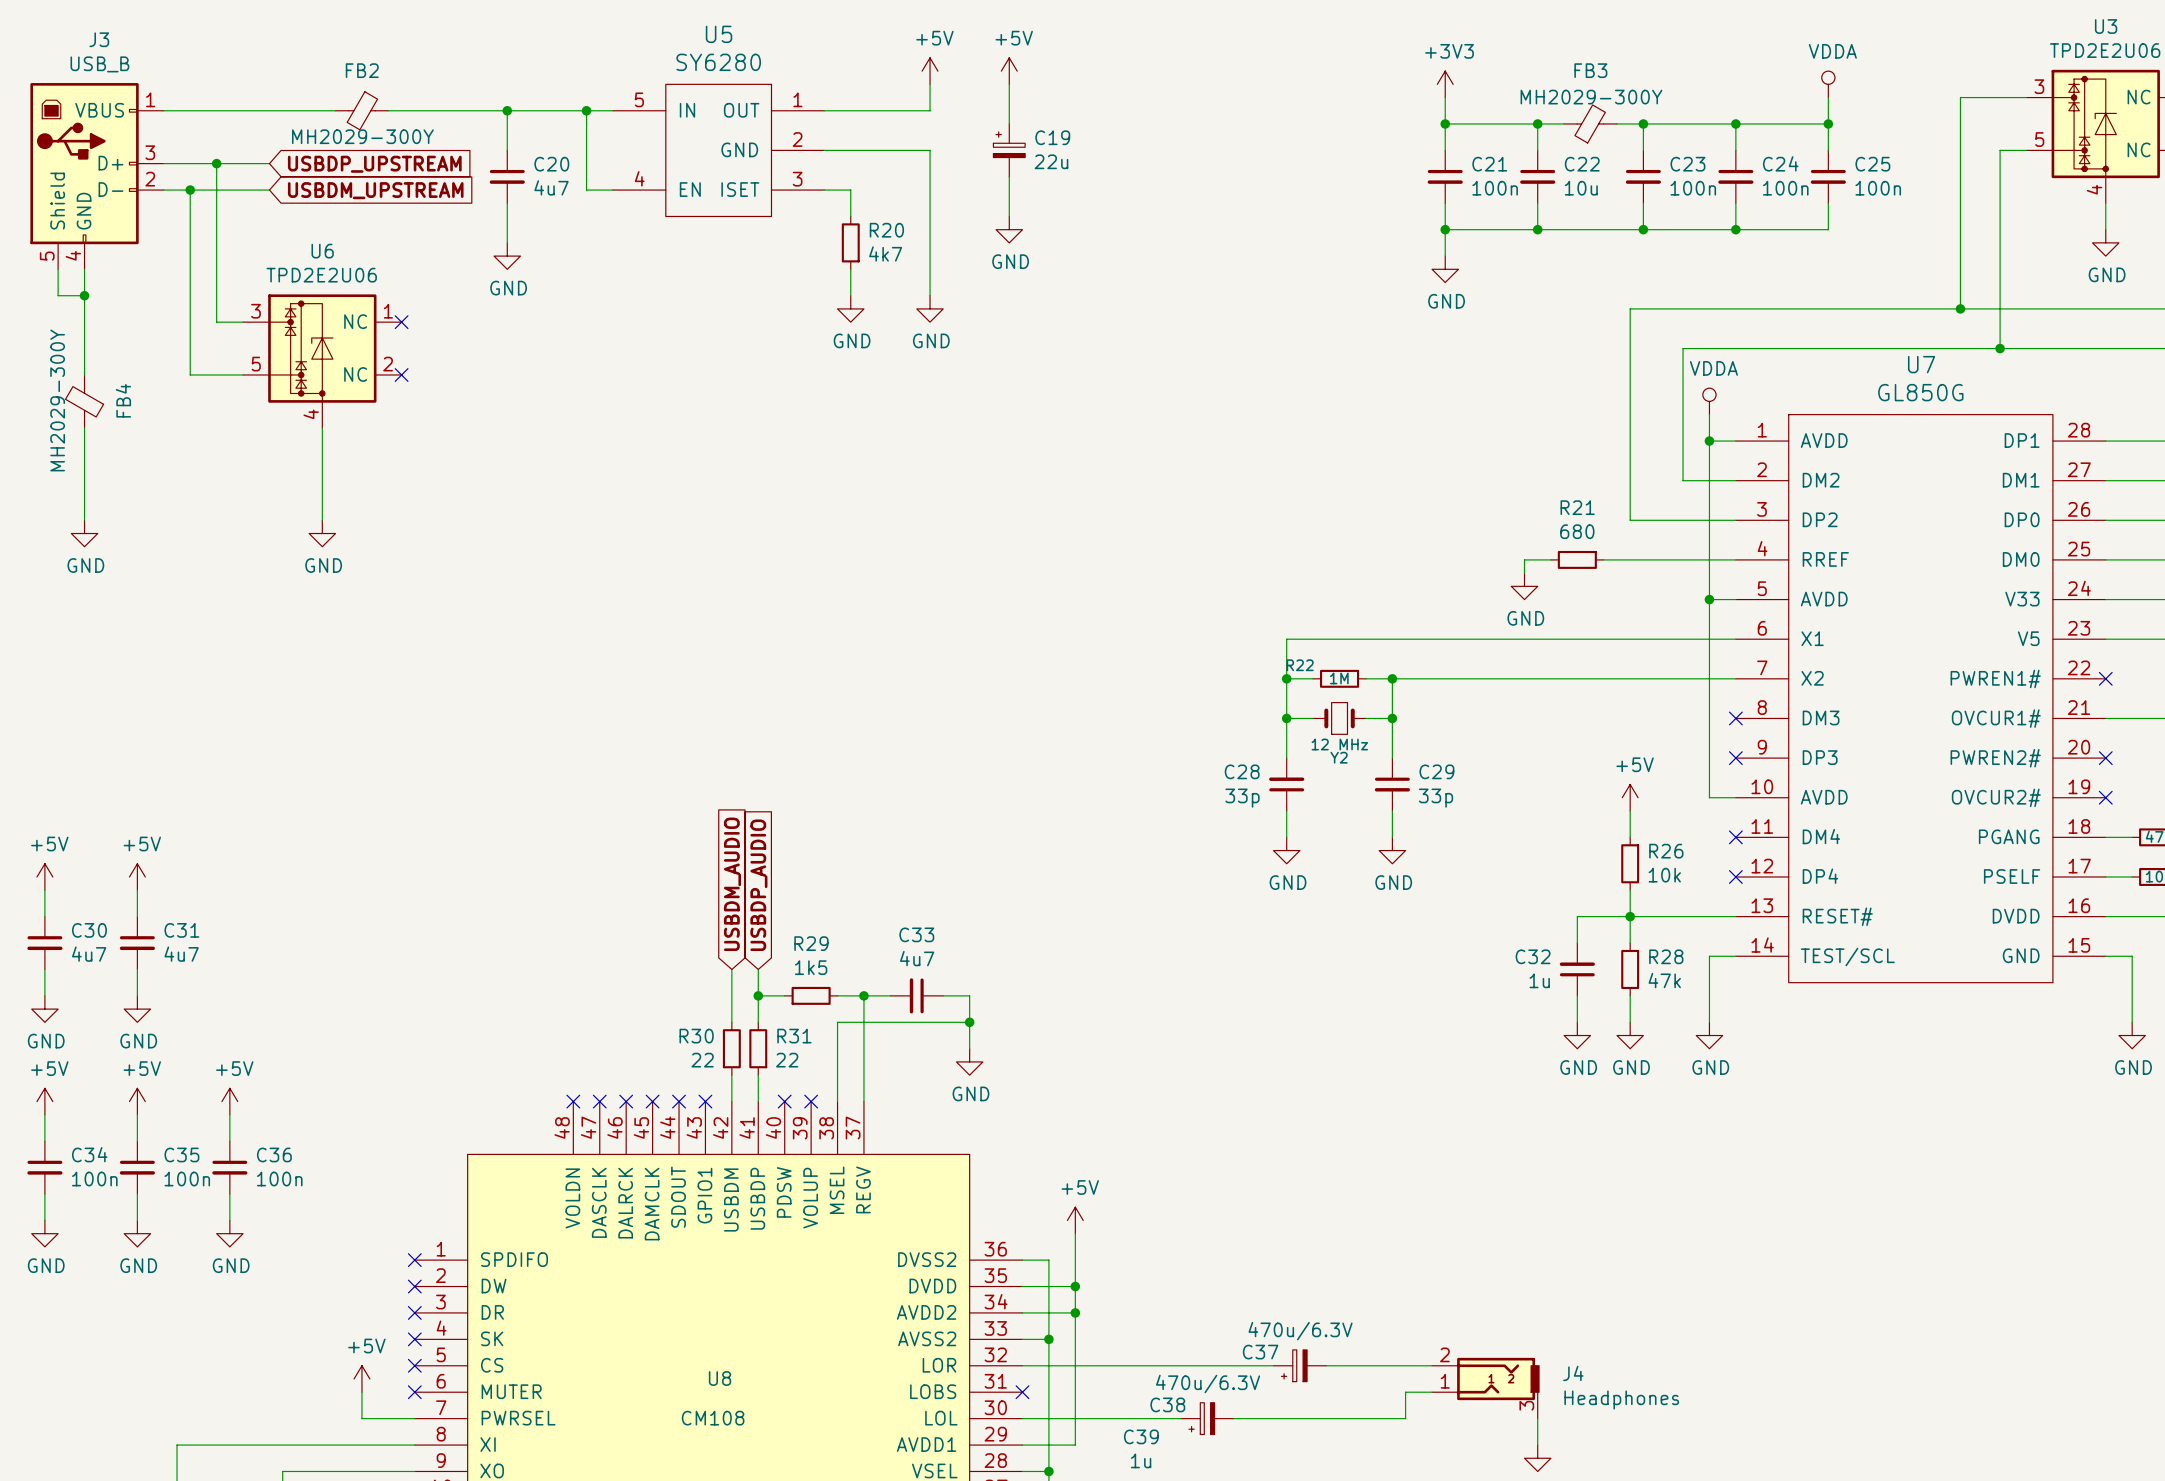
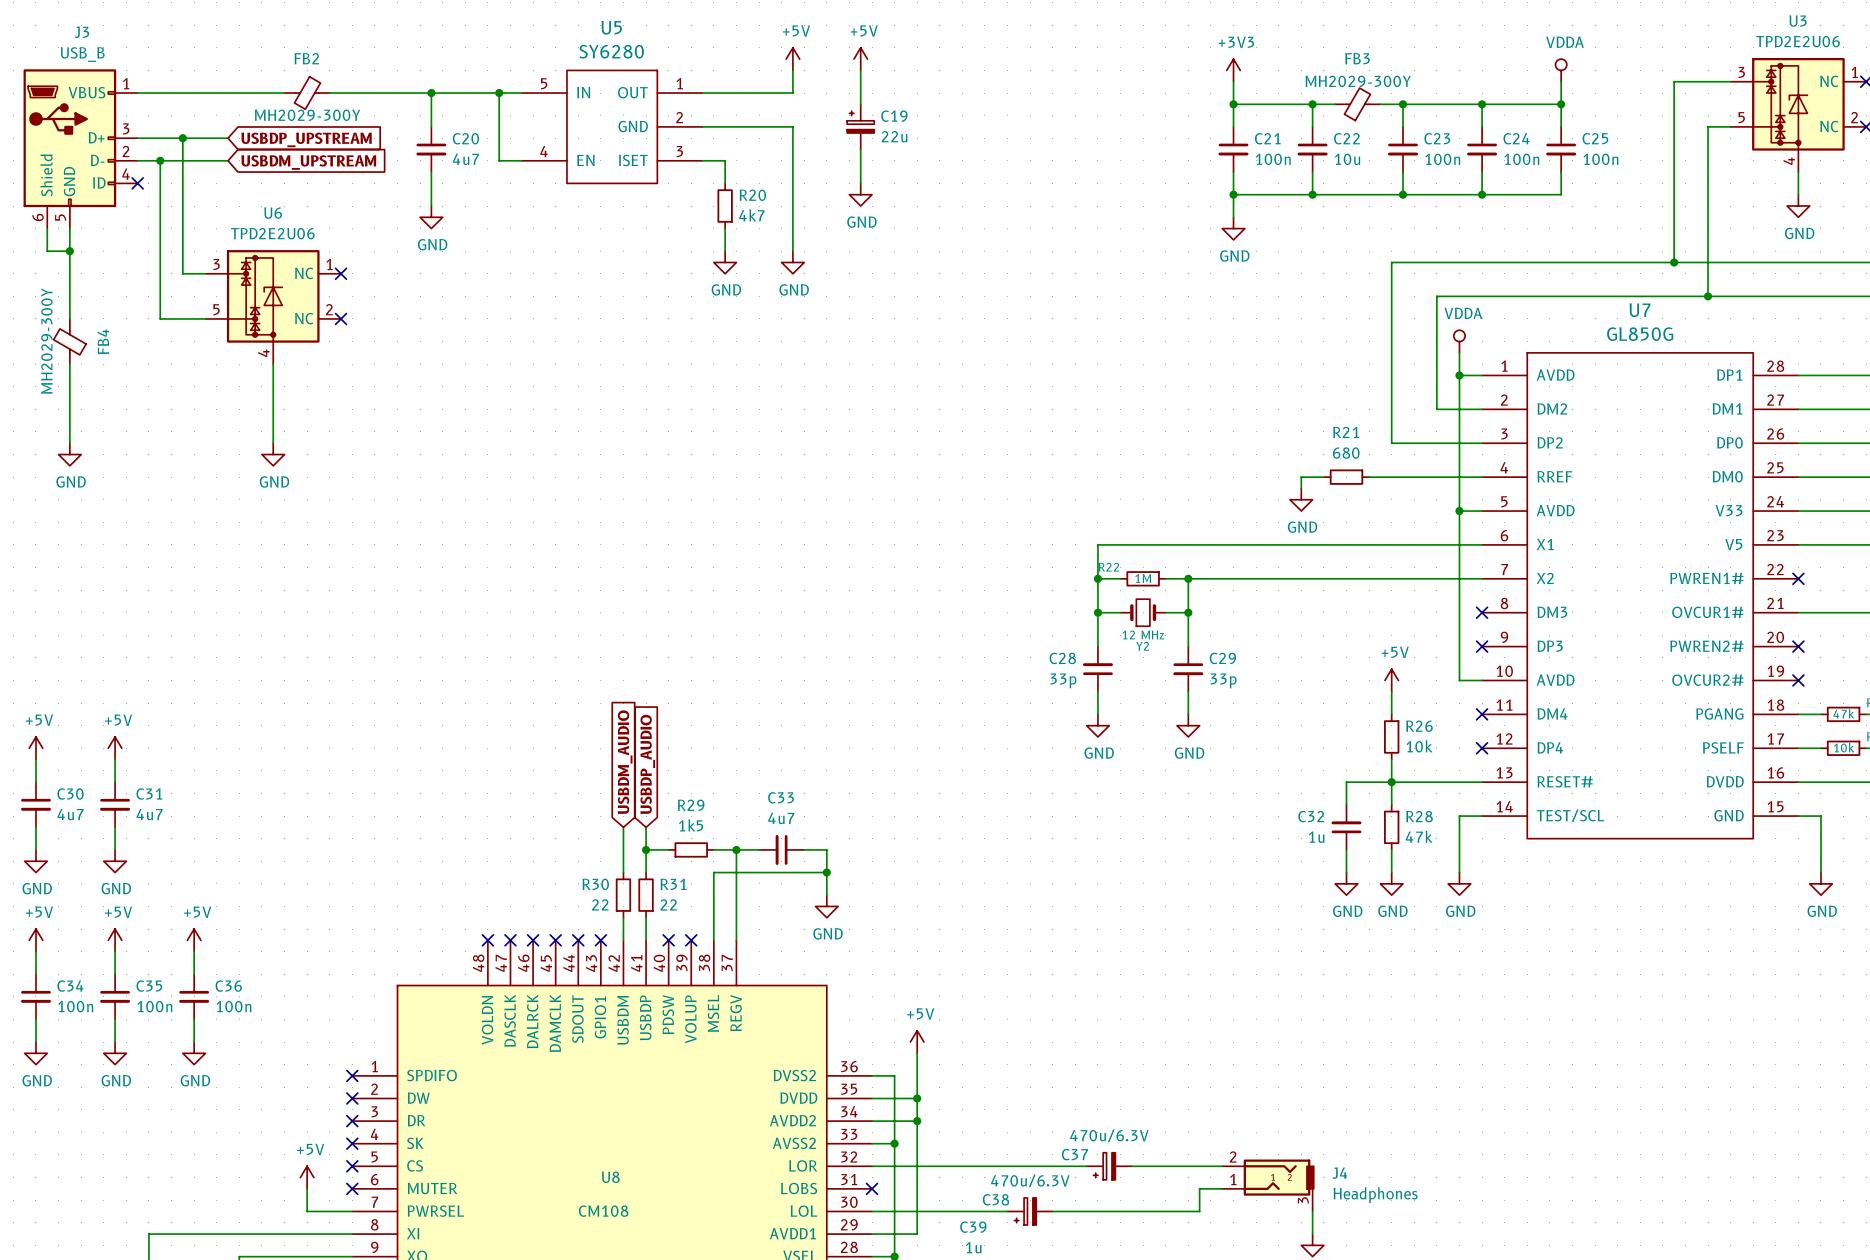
J3 symbol: [30, 83, 164, 270] -> [23, 69, 138, 229]
no-connect mark: none -> (137, 183)

